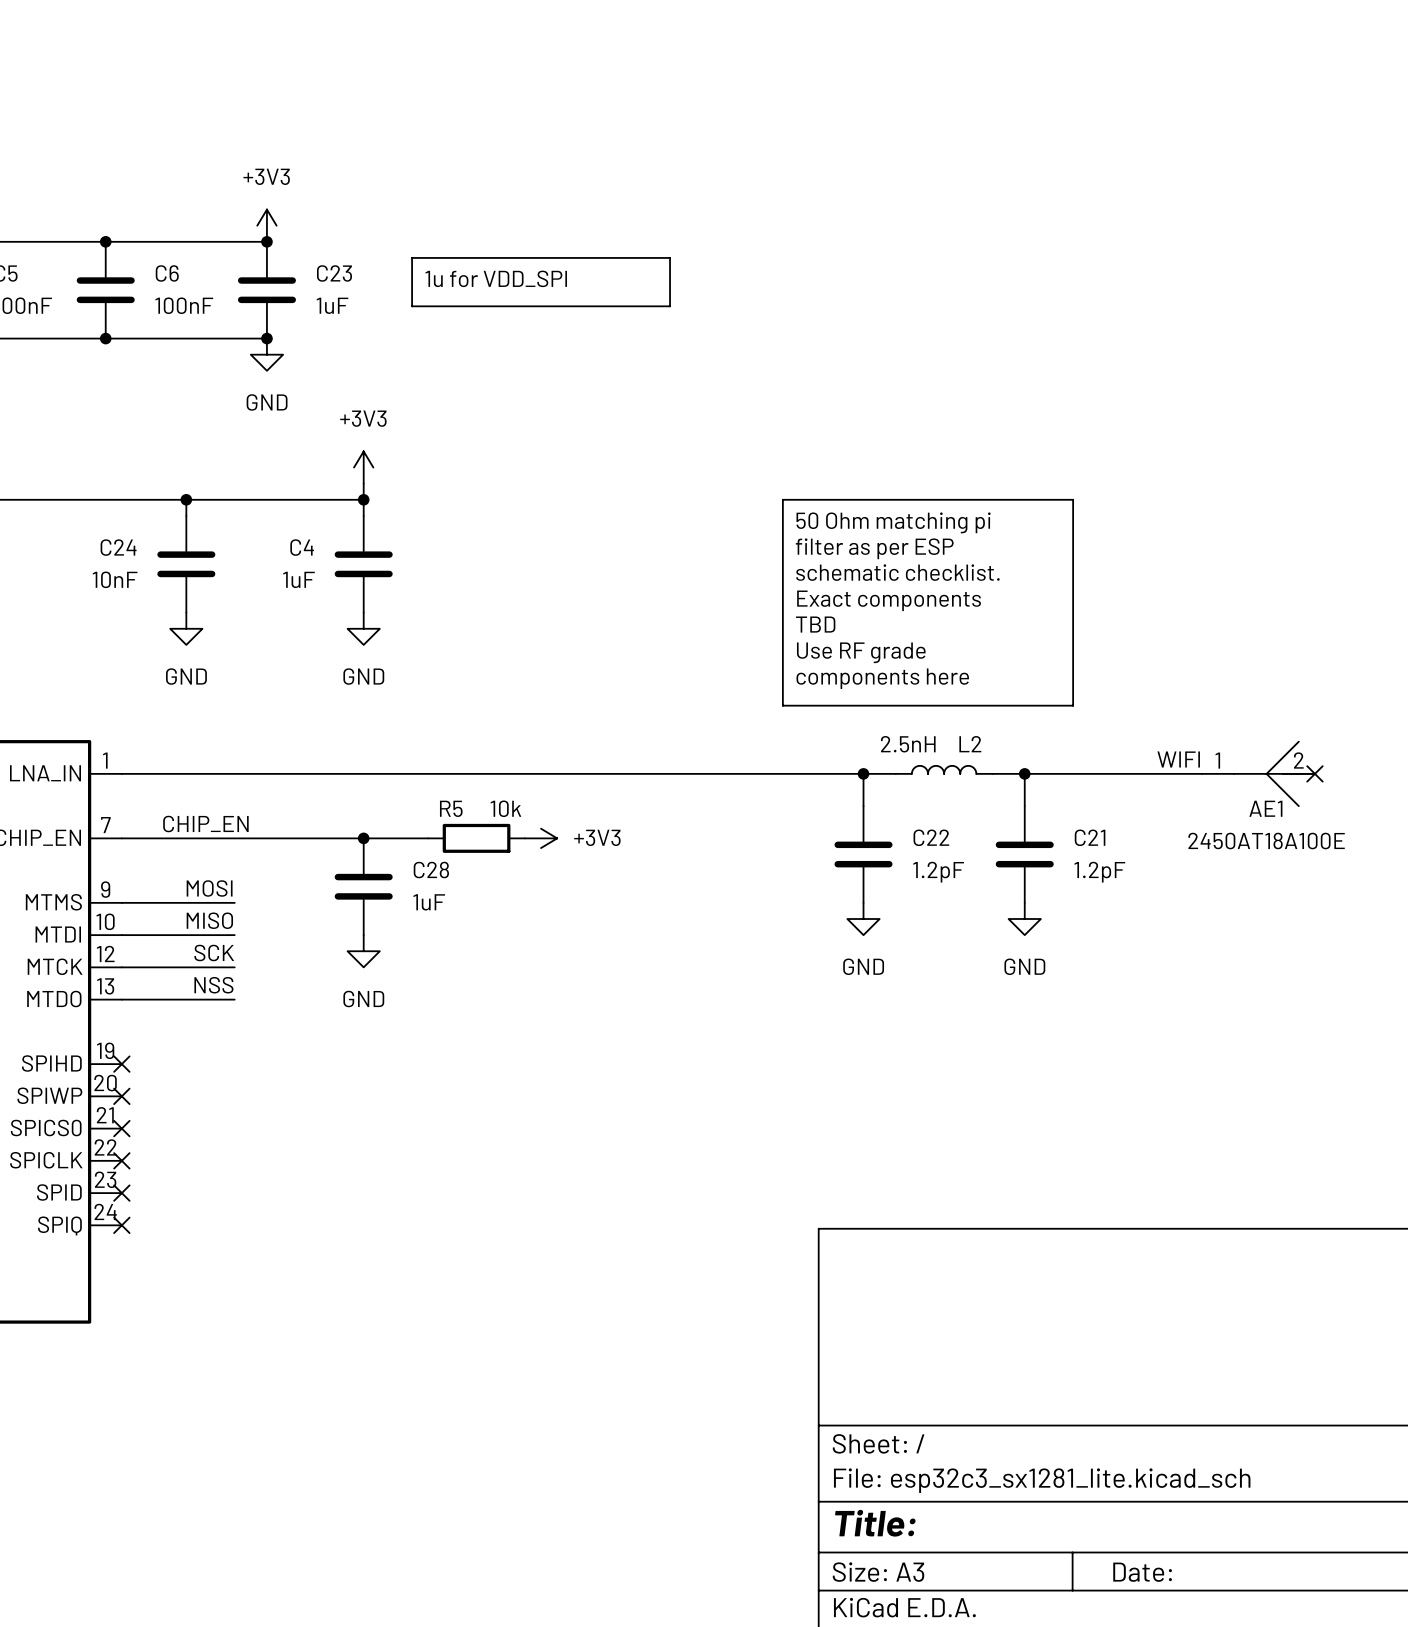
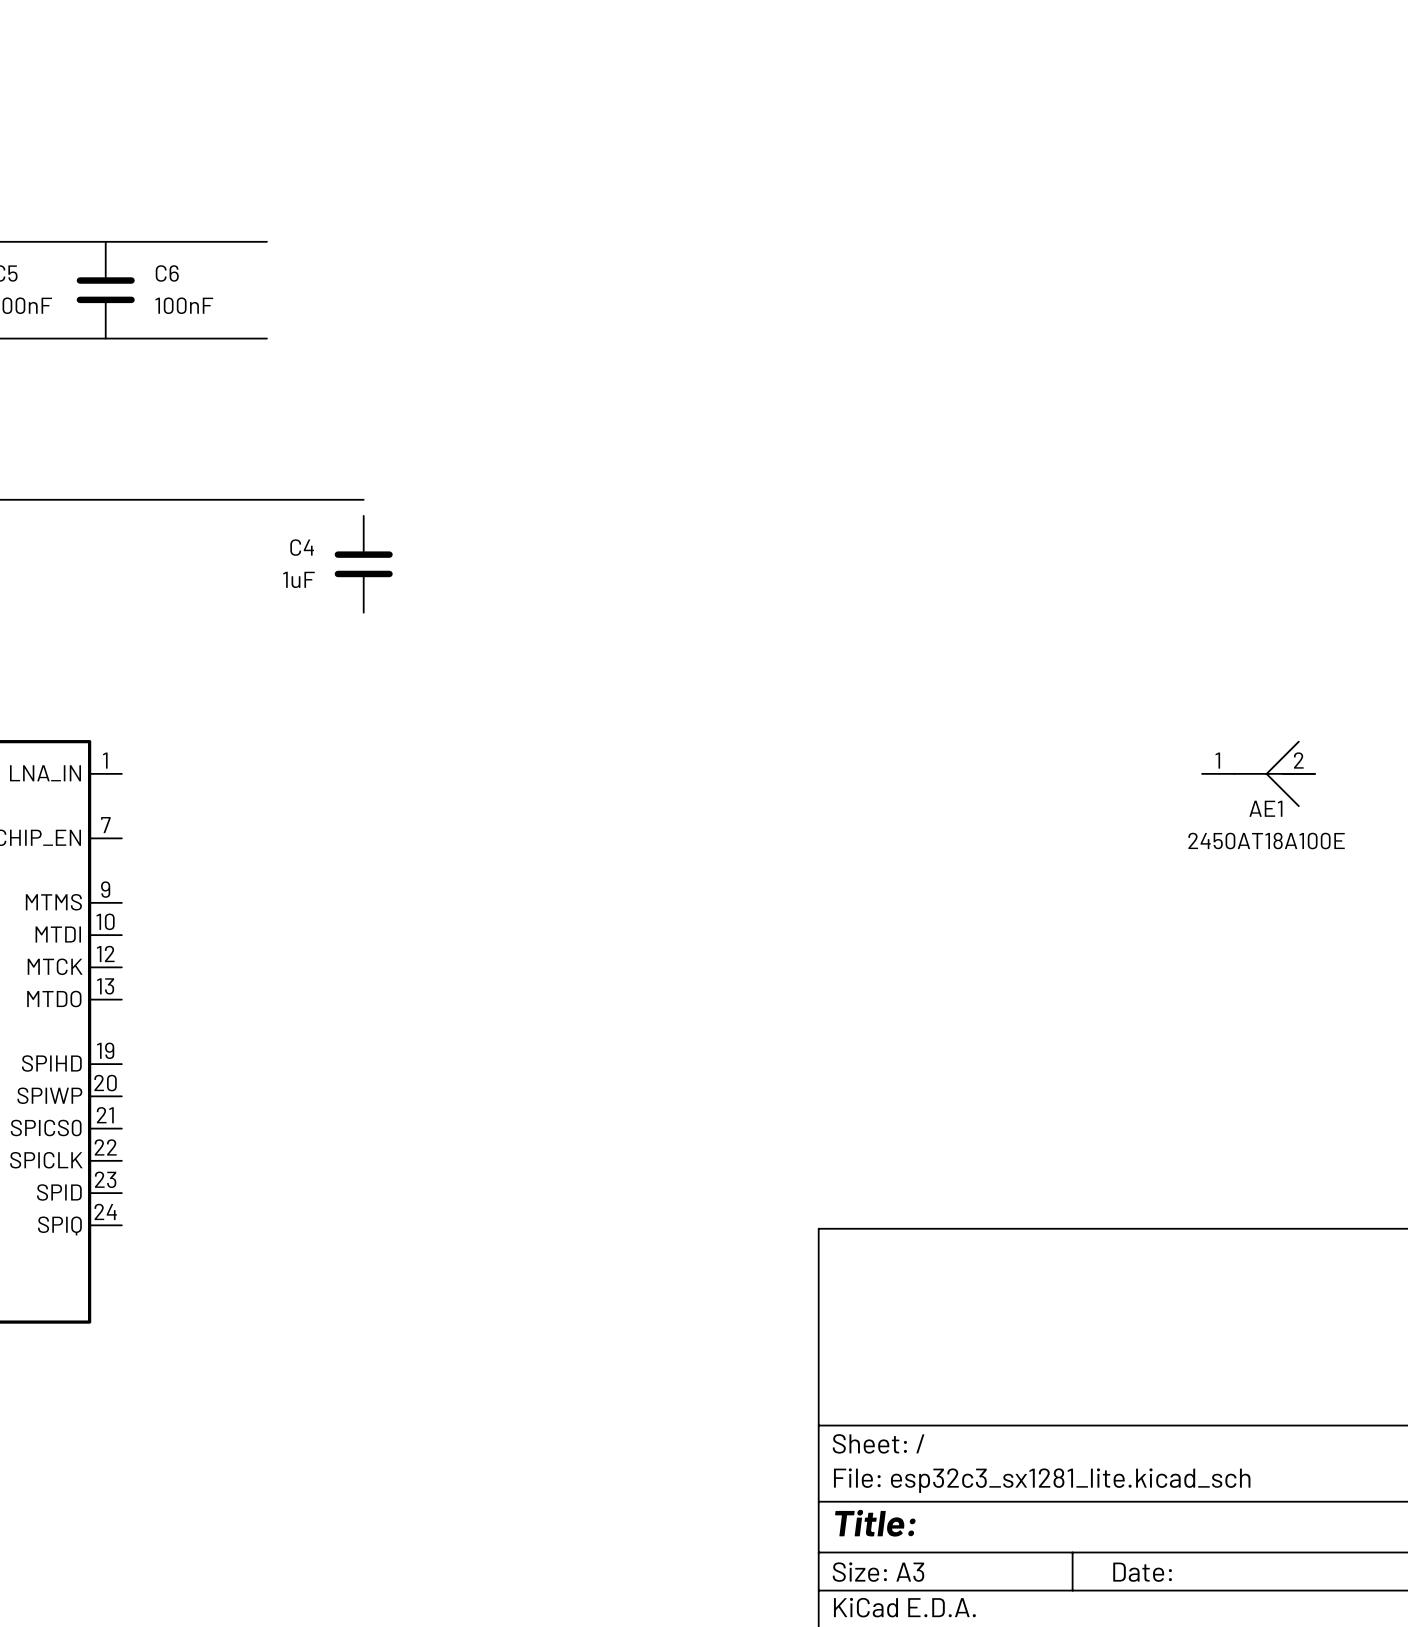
power symbol: +3V3 (266, 225) -> none
junction: (105, 241) -> none
junction: (266, 241) -> none
line: (412, 257) (670, 257) (670, 306) (412, 306) (412, 257) -> none
text: 1u for VDD_SPI (496, 278) -> none
C23: 1uF (266, 290) -> none
junction: (105, 338) -> none
junction: (266, 338) -> none
power symbol: GND (266, 354) -> none
power symbol: +3V3 (363, 467) -> none
wire: (363, 483) (363, 515) -> none
wire: (186, 499) (186, 515) -> none
junction: (186, 499) -> none
junction: (363, 499) -> none
line: (782, 499) (1073, 499) (1073, 705) (782, 705) (782, 499) -> none
text: 50 Ohm matching pi (893, 522) -> none
text: filter as per ESP (874, 548) -> none
C24: 10nF (186, 564) -> none
text: schematic checklist. (897, 572) -> none
text: Exact components (889, 600) -> none
text: TBD (815, 624) -> none
power symbol: GND (186, 628) -> none
power symbol: GND (363, 628) -> none
text: Use RF grade (861, 652) -> none
text: components here (882, 678) -> none
label: WIFI (1178, 759) -> none
L2: 2.5nH (944, 769) -> none
wire: (121, 773) (895, 773) -> none
wire: (863, 773) (863, 806) -> none
junction: (863, 773) -> none
wire: (992, 773) (1202, 773) -> none
wire: (1024, 773) (1024, 806) -> none
junction: (1024, 773) -> none
no-connect mark: (1314, 773) -> none
label: CHIP_EN (205, 824) -> none
wire: (121, 838) (428, 838) -> none
junction: (363, 838) -> none
R5: 10k (476, 838) -> none
power symbol: +3V3 (541, 838) -> none
C22: 1.2pF (863, 854) -> none
C21: 1.2pF (1024, 854) -> none
C28: 1uF (363, 886) -> none
label: MOSI (209, 888) -> none
wire: (121, 902) (234, 902) -> none
power symbol: GND (863, 919) -> none
power symbol: GND (1024, 919) -> none
label: MISO (209, 920) -> none
wire: (121, 935) (234, 935) -> none
power symbol: GND (363, 951) -> none
label: SCK (214, 952) -> none
wire: (121, 967) (234, 967) -> none
label: NSS (213, 985) -> none
wire: (121, 999) (234, 999) -> none
no-connect mark: (121, 1064) -> none
no-connect mark: (121, 1096) -> none
no-connect mark: (121, 1128) -> none
no-connect mark: (121, 1160) -> none
no-connect mark: (121, 1193) -> none
no-connect mark: (121, 1225) -> none

